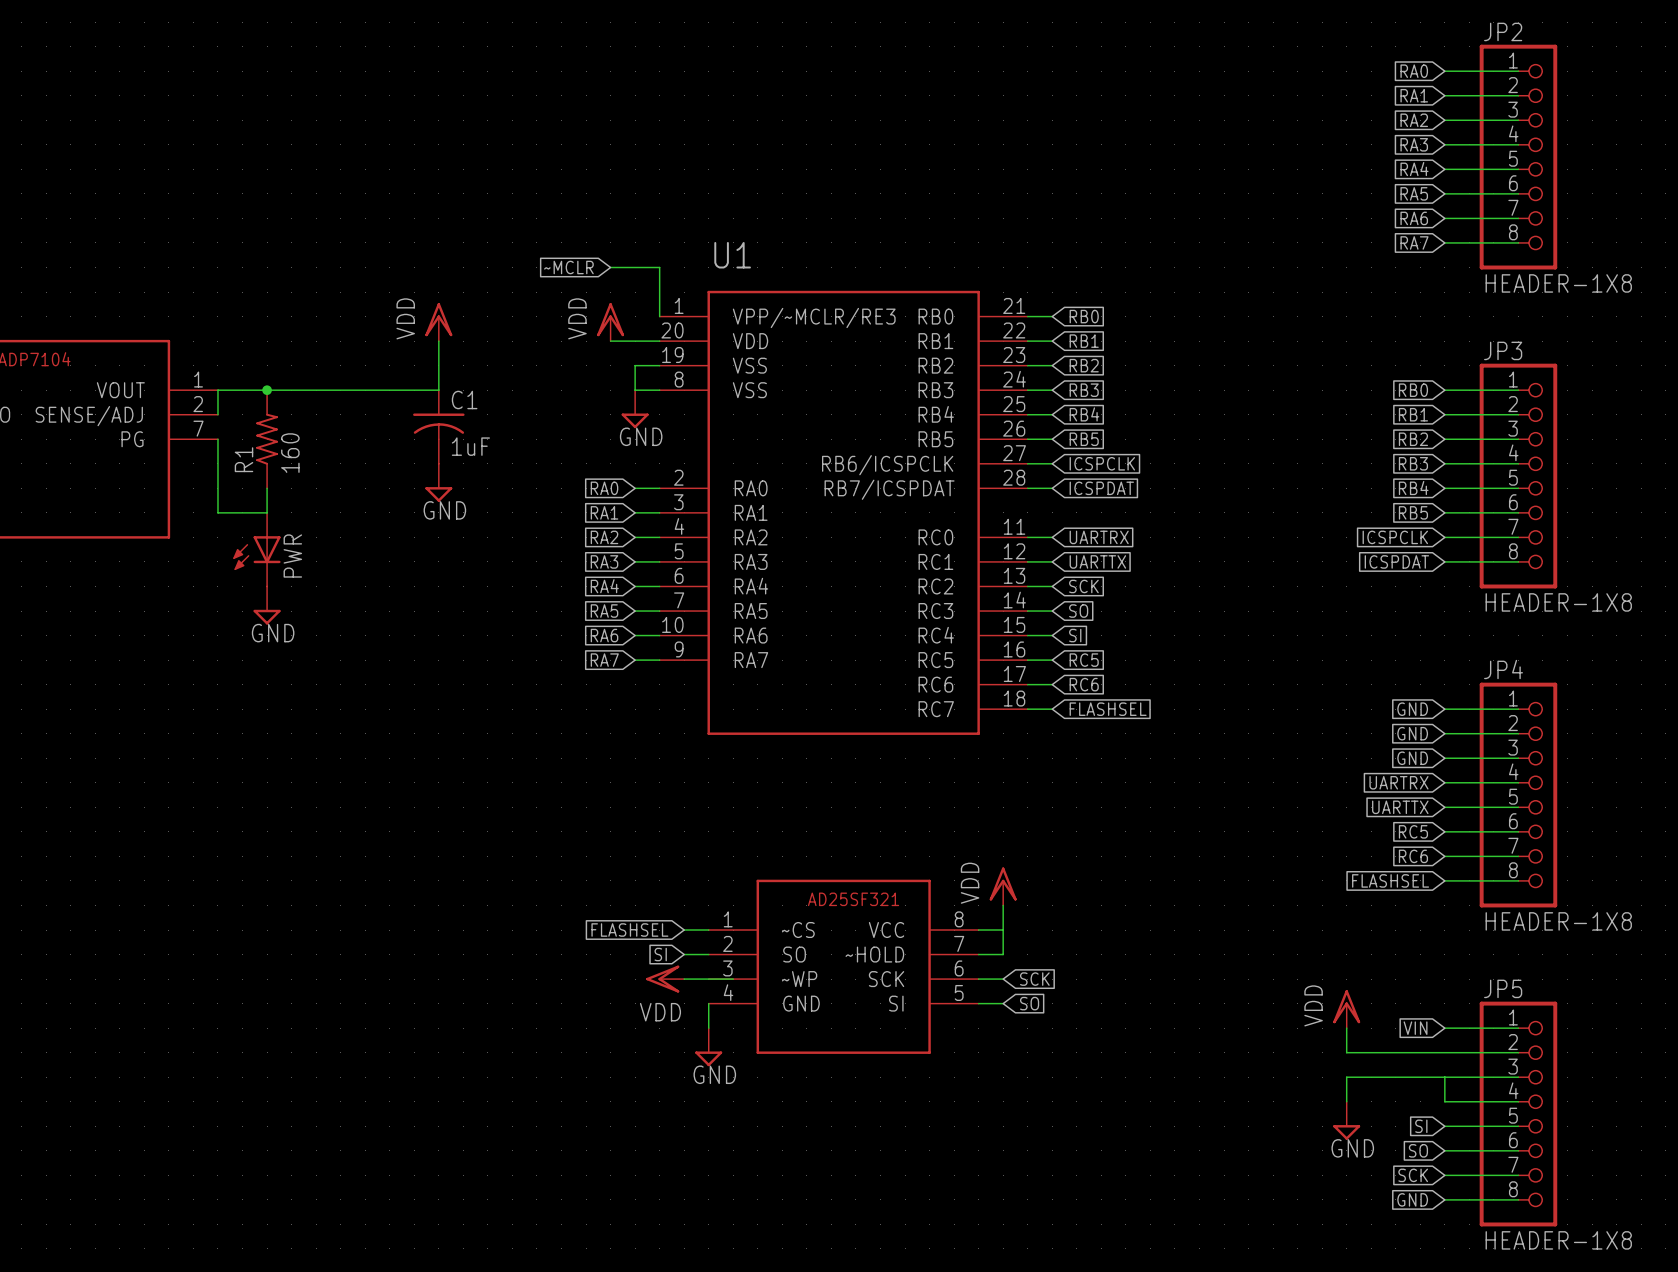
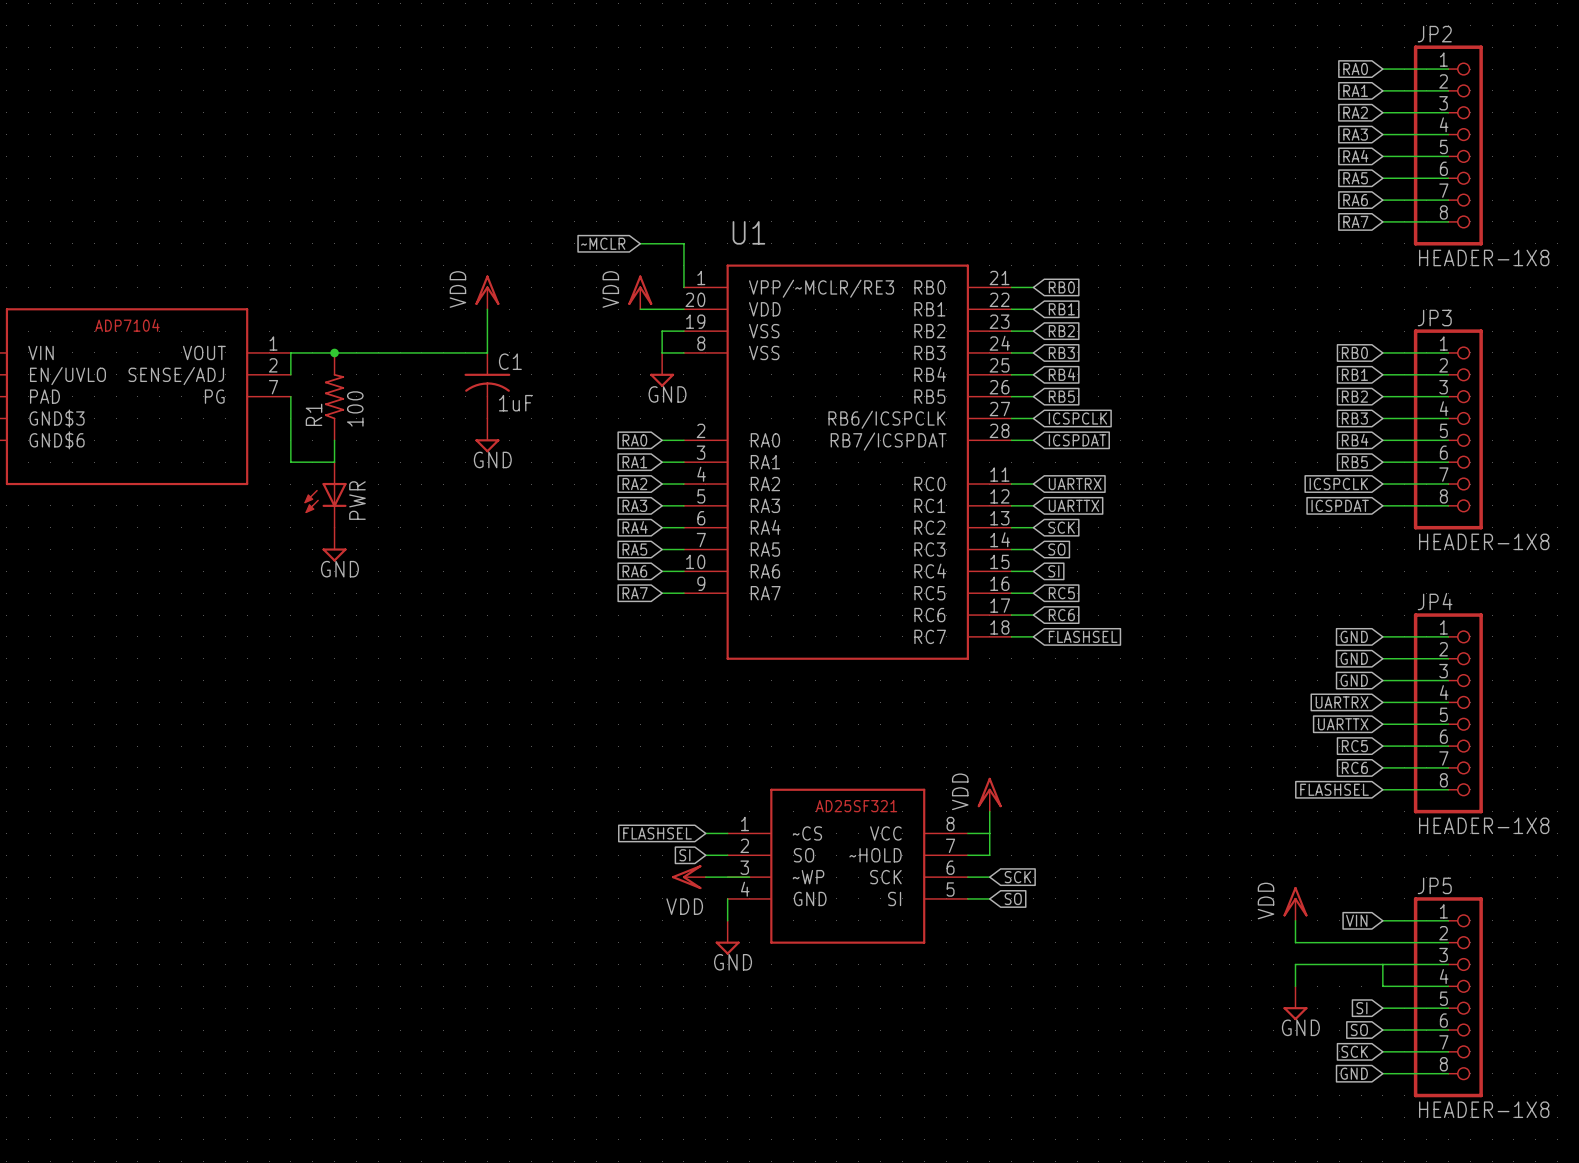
R1 value: 160 (290, 453) -> 100 (355, 408)

